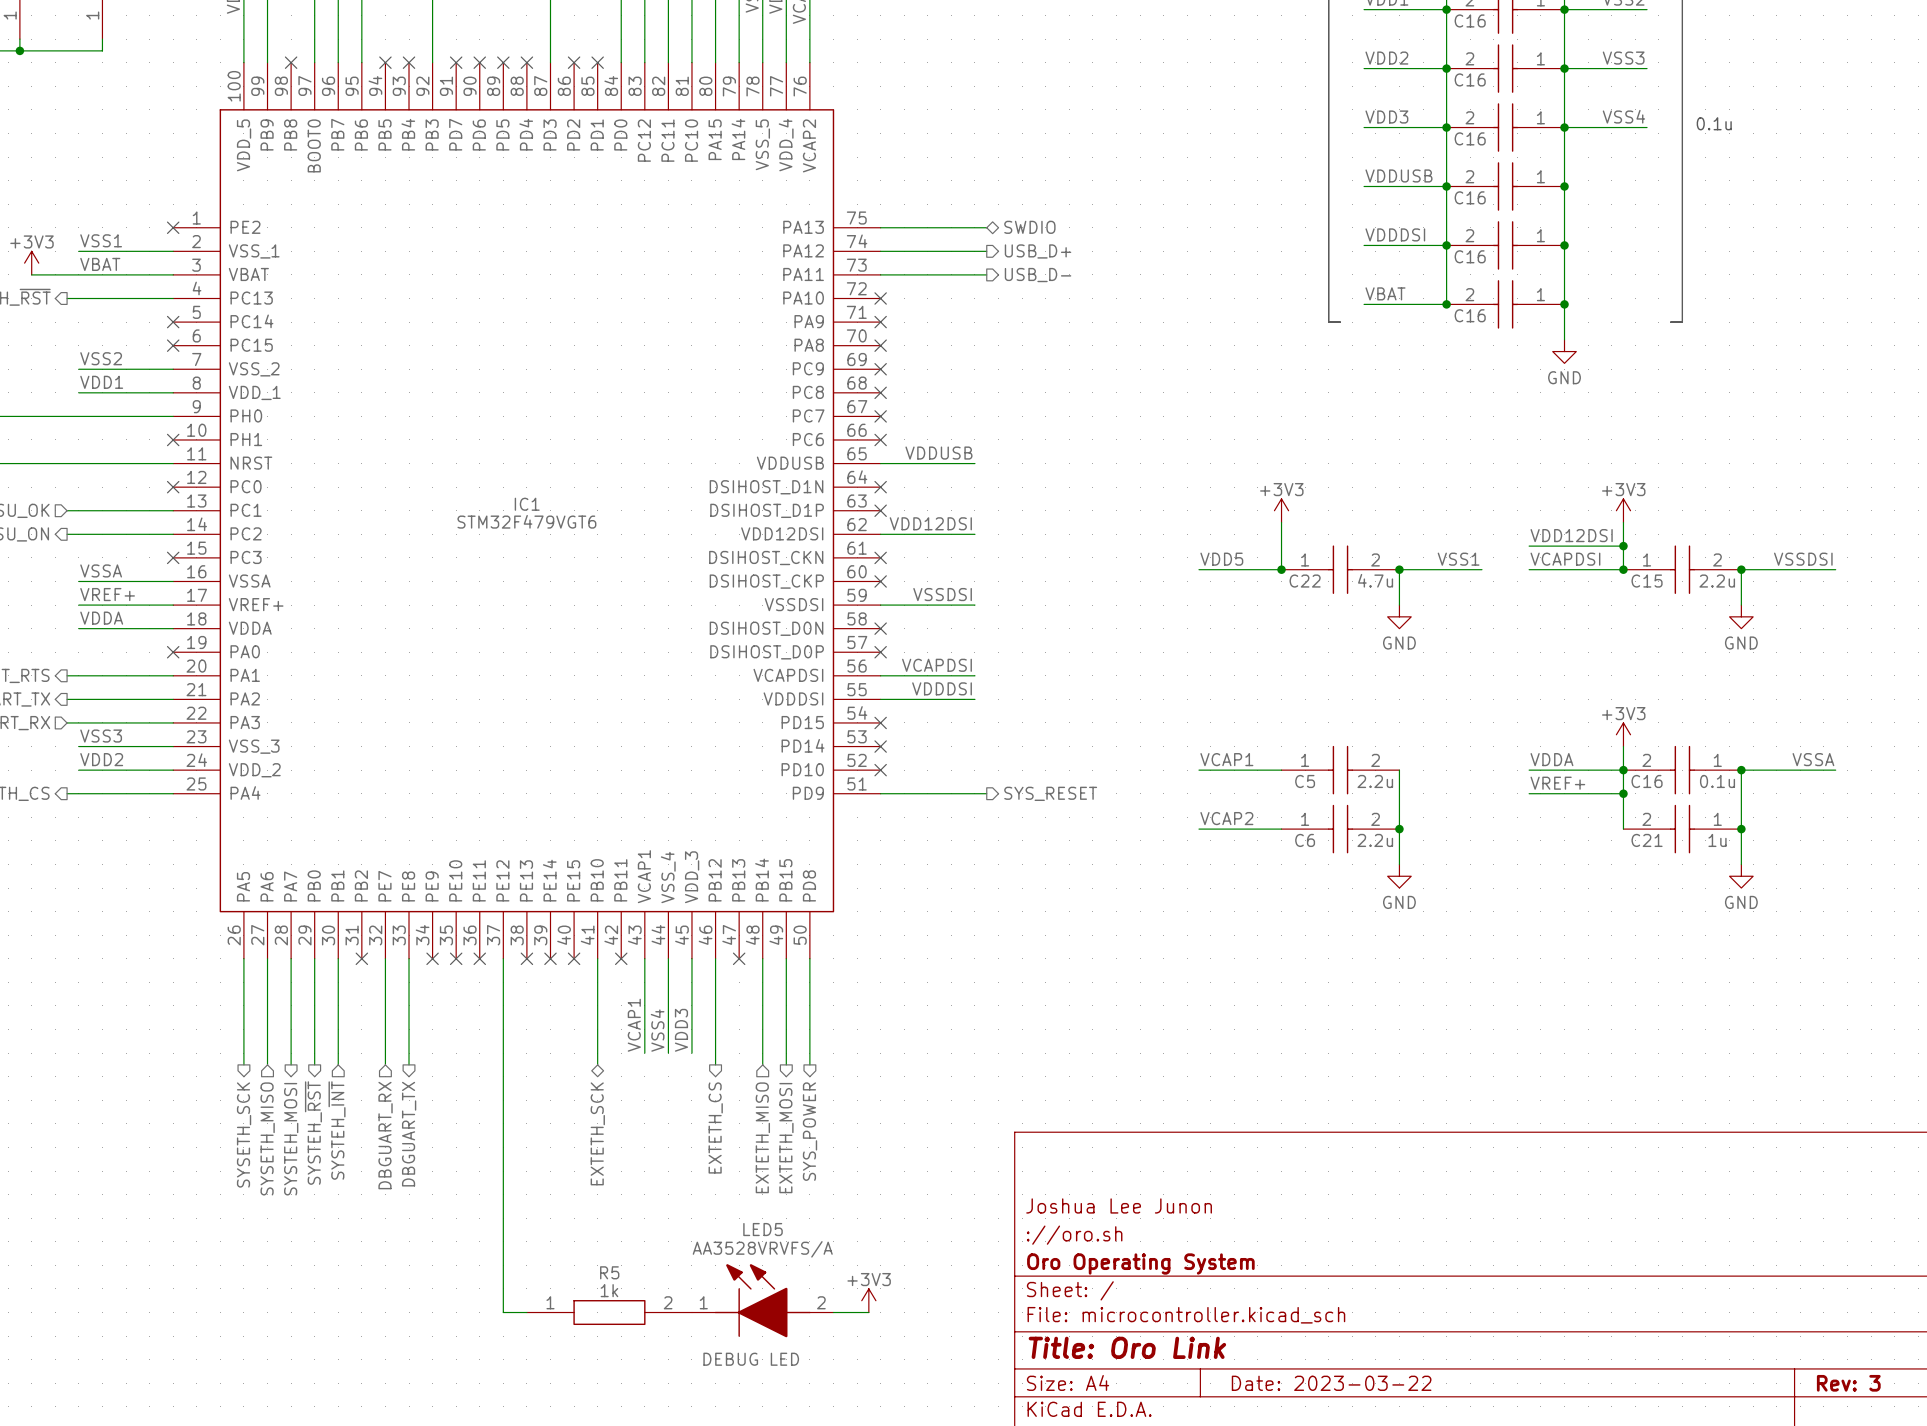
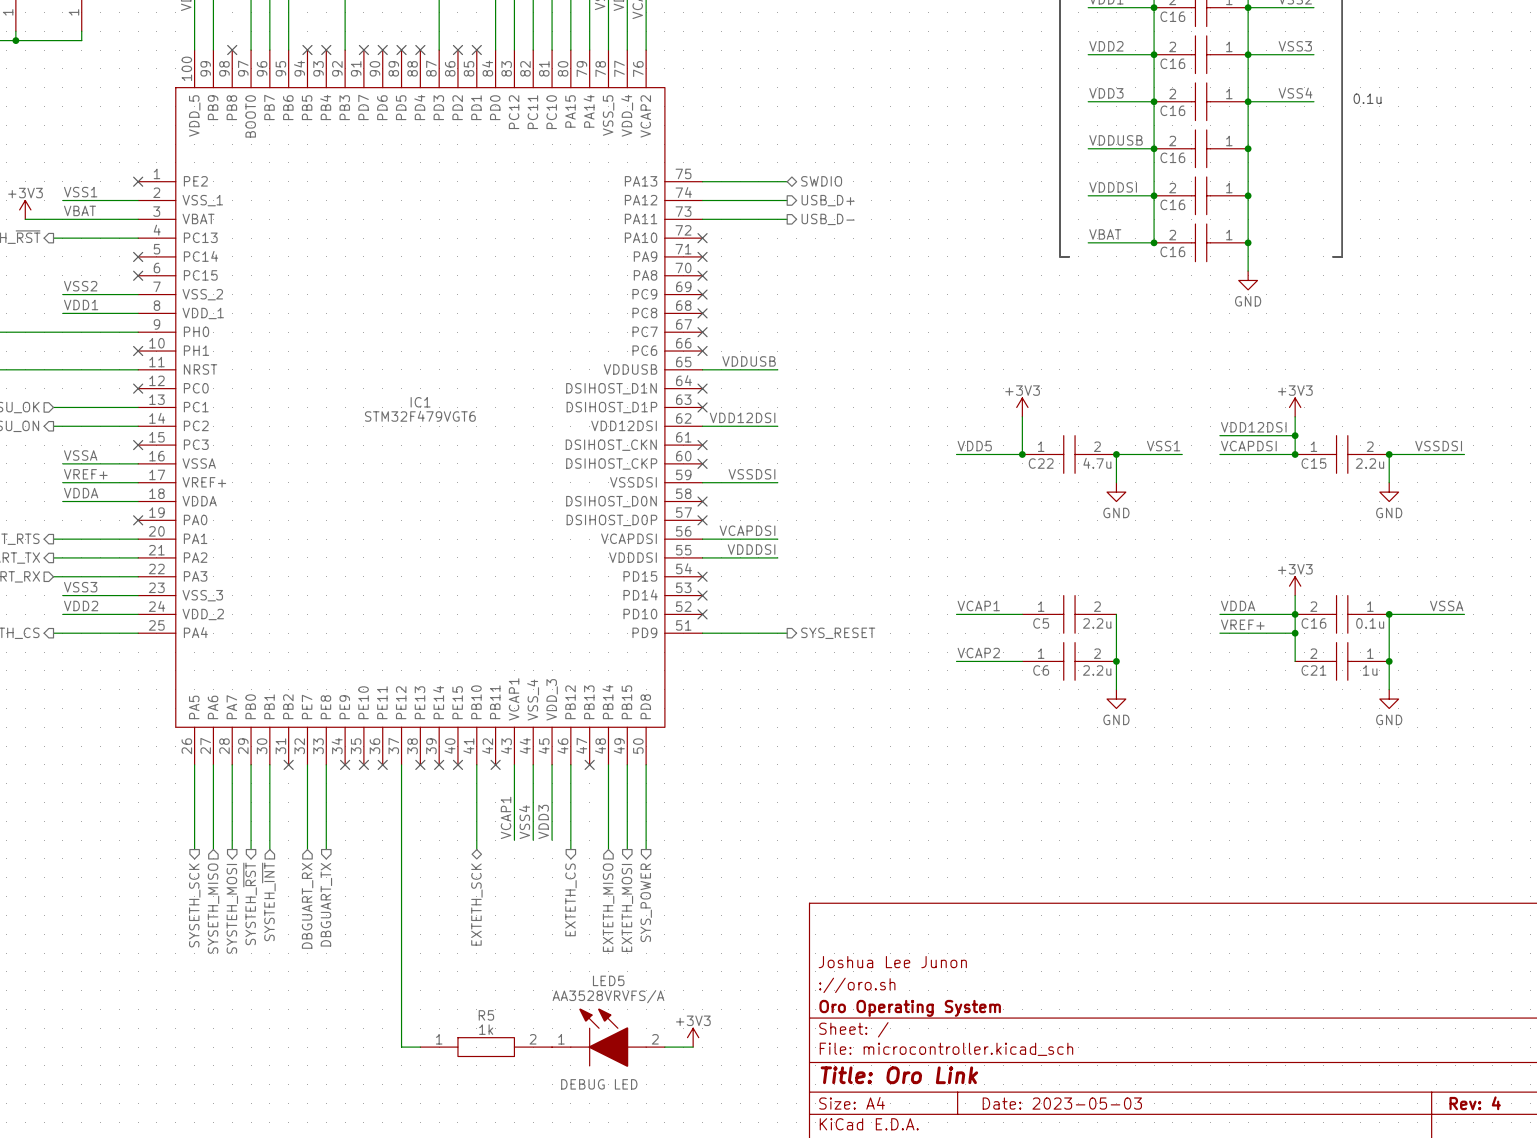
title block: Date: 2023-03-22 (1331, 1383) -> Date: 2023-05-03 (1062, 1103)
title block: Rev: 3 (1848, 1383) -> Rev: 4 (1475, 1103)

